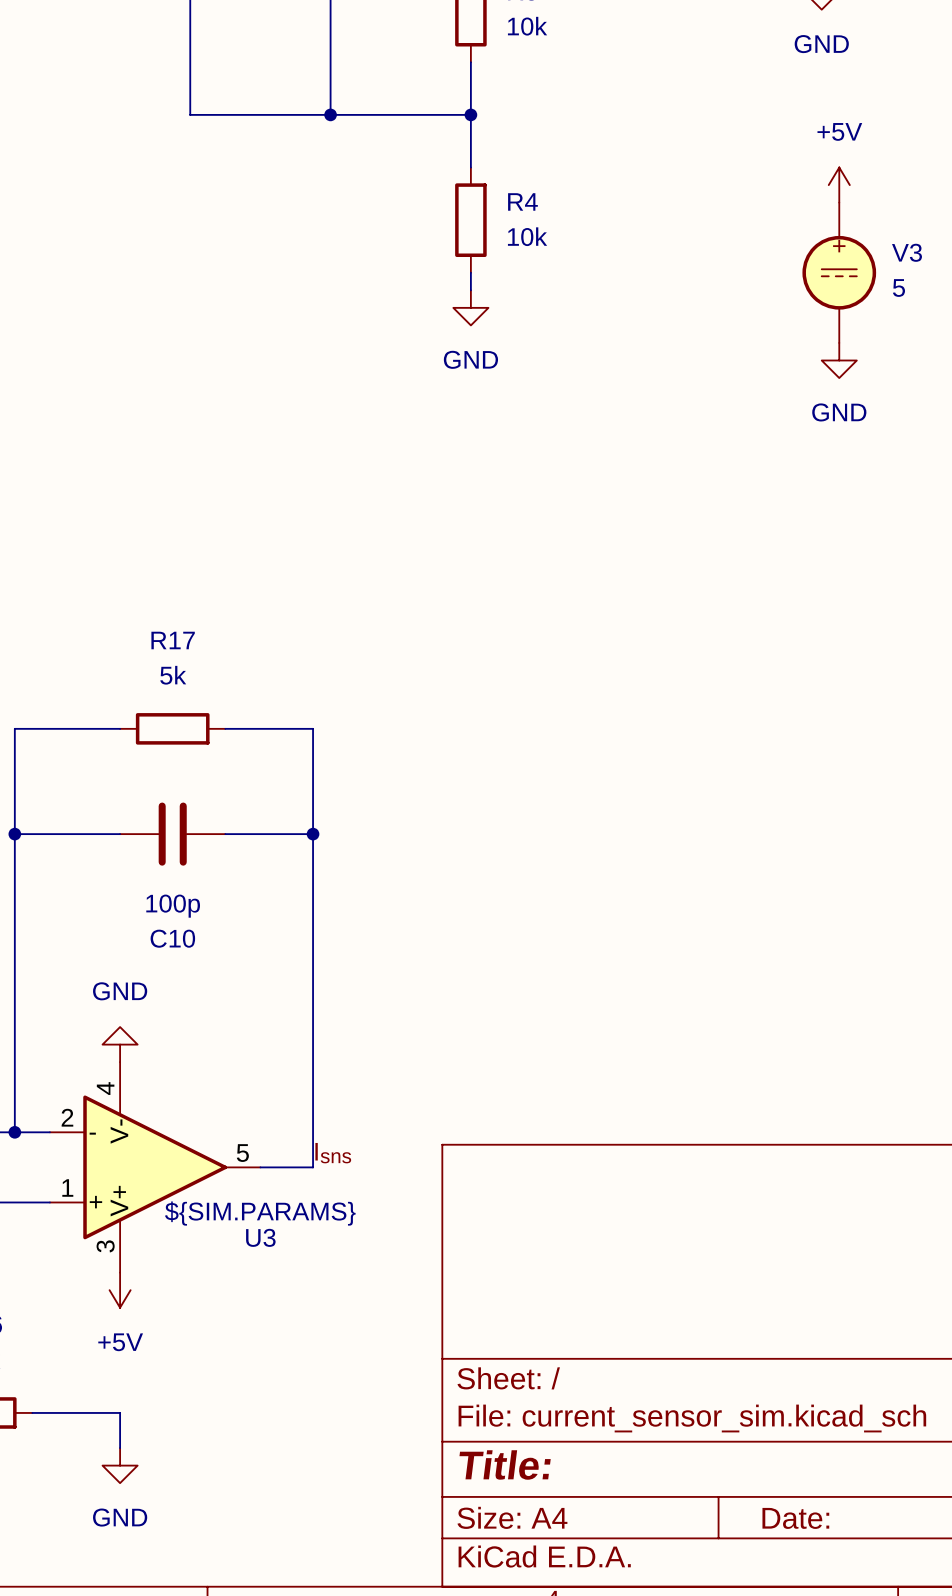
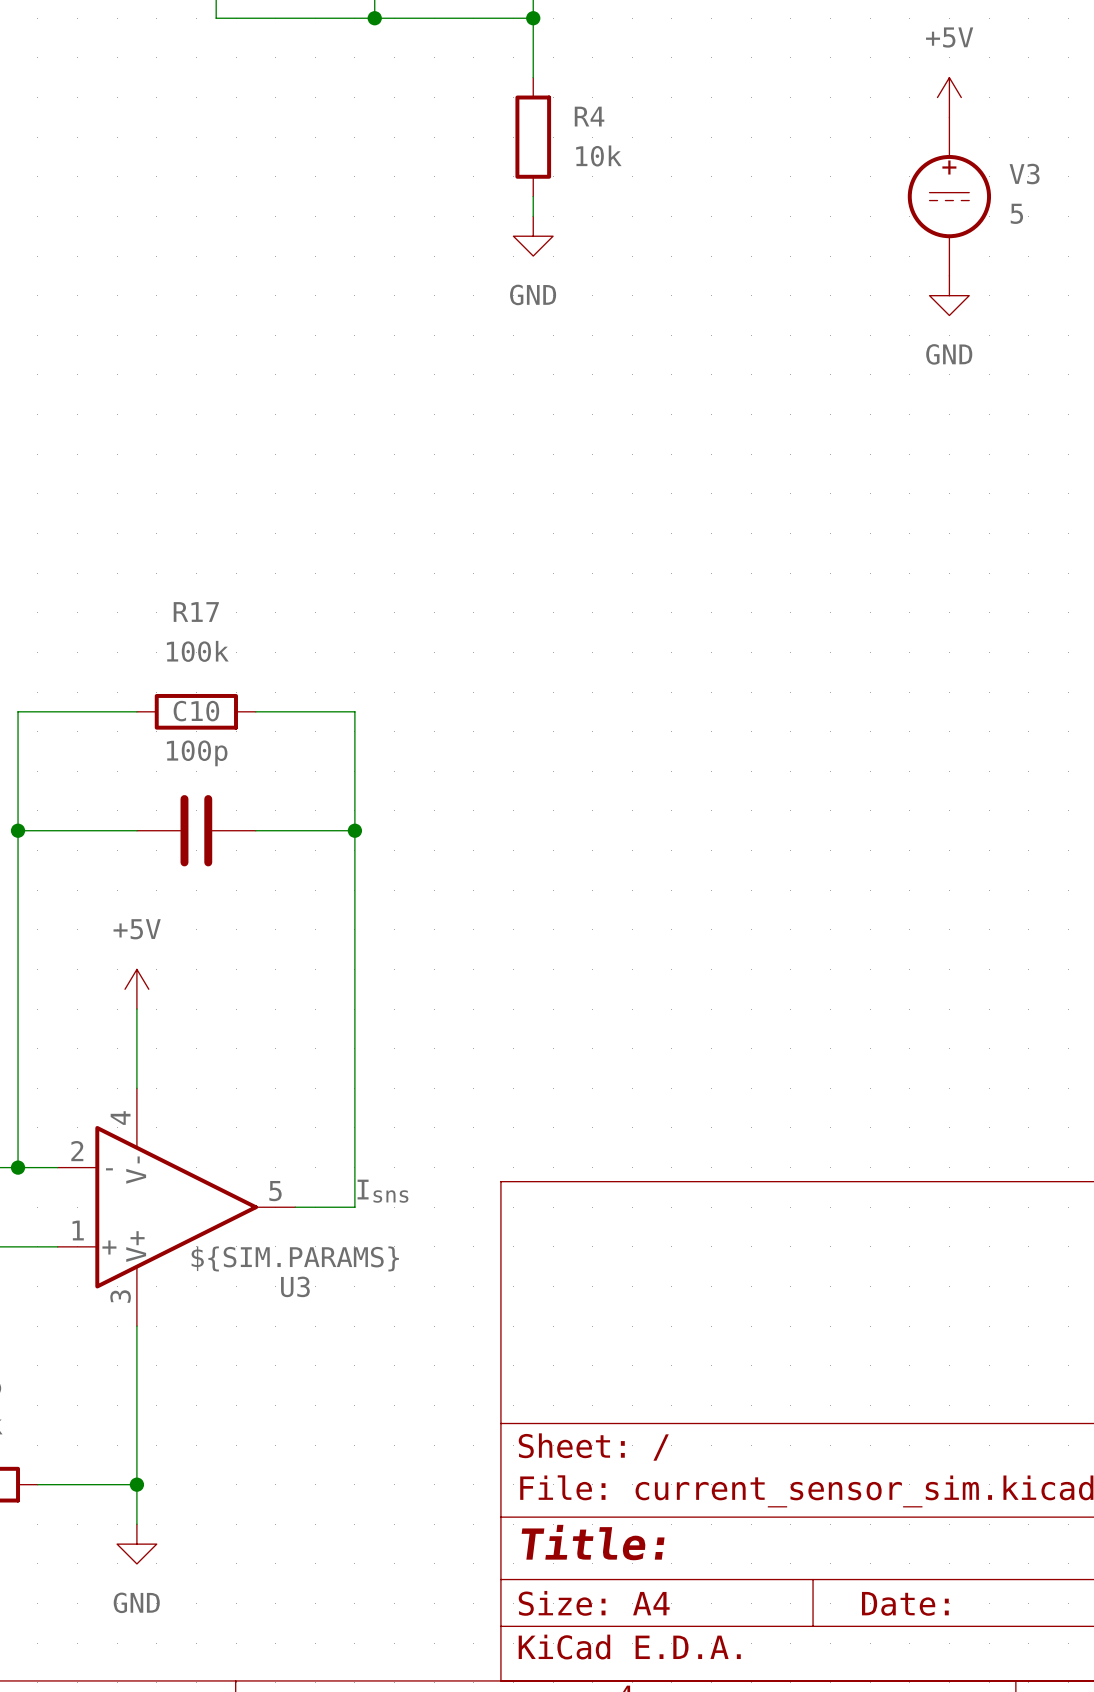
R17 value: 5k (173, 675) -> 100k (197, 651)
C10 value position: 100p (173, 906) -> 100p (197, 753)
C10 name position: C10 (172, 938) -> C10 (196, 711)
wire: none -> (136, 1009) (136, 1088)
power symbol: GND (120, 1044) -> none
wire: none -> (136, 1326) (136, 1484)
power symbol rotation: 0° (120, 1290) -> 180° (136, 989)
power symbol position: +5V (120, 1290) -> +5V (136, 989)
junction: none -> (136, 1484)

